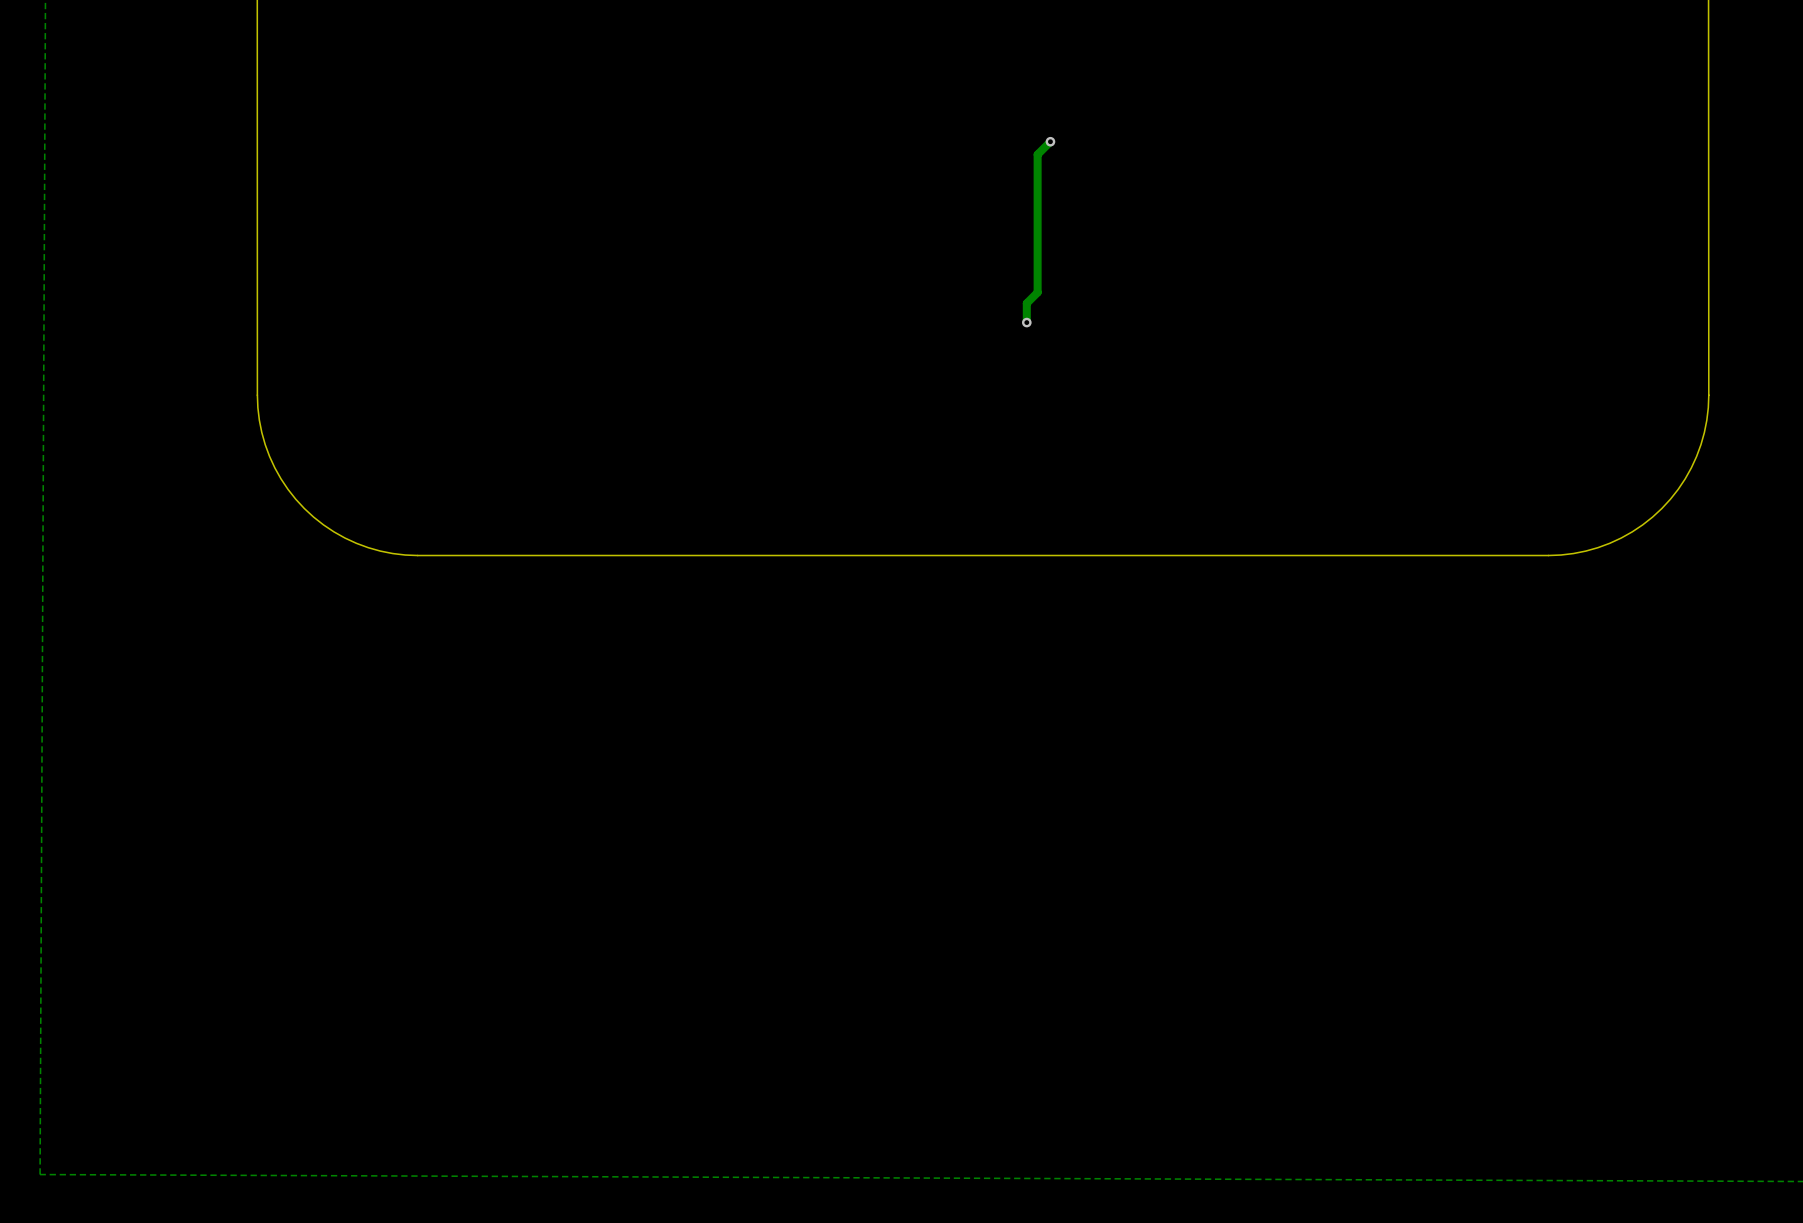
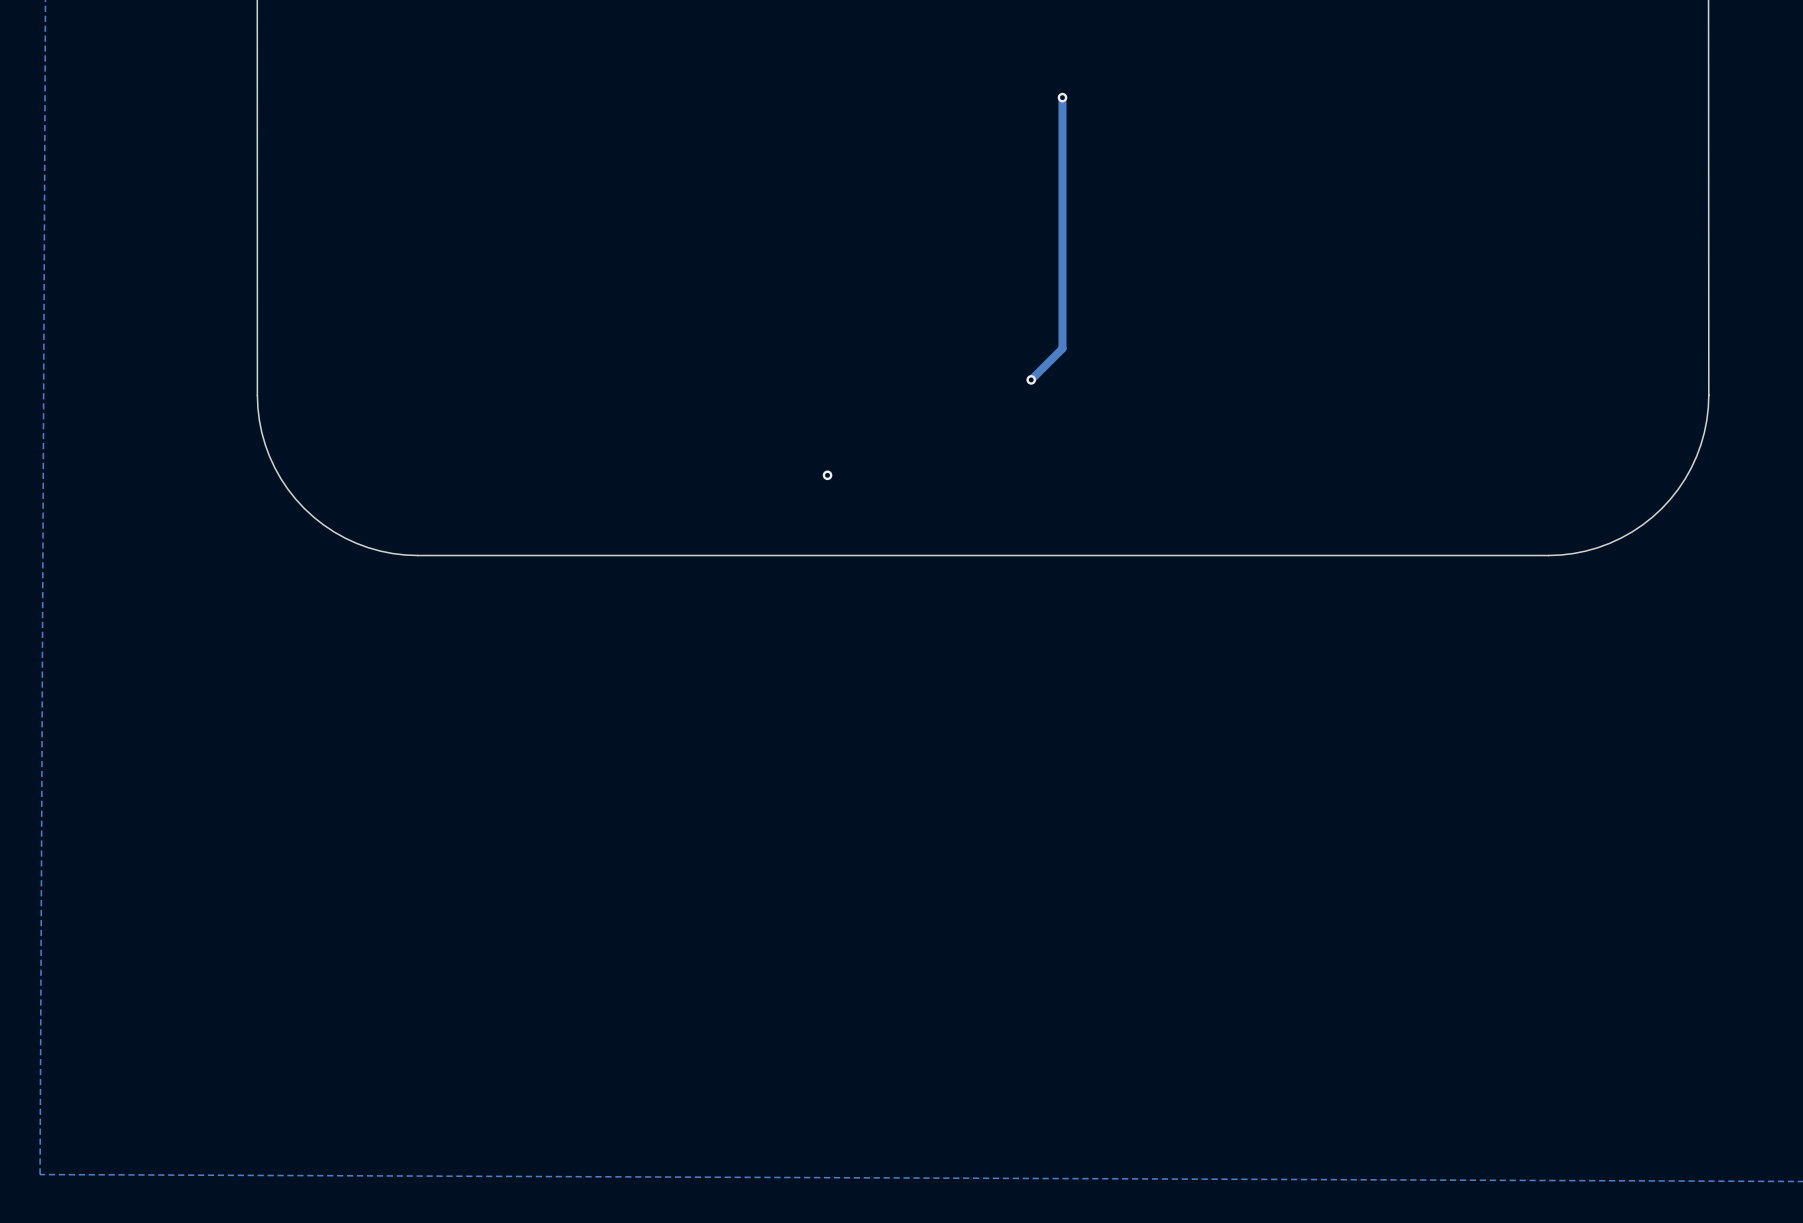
track: none -> (1062, 97) (1062, 348) (1031, 379)
track: (1050, 141) (1037, 154) (1037, 292) (1026, 303) (1026, 322) -> none
via position: (1050, 141) -> (1062, 97)
via position: (1026, 322) -> (1031, 379)
via: none -> (827, 475)

